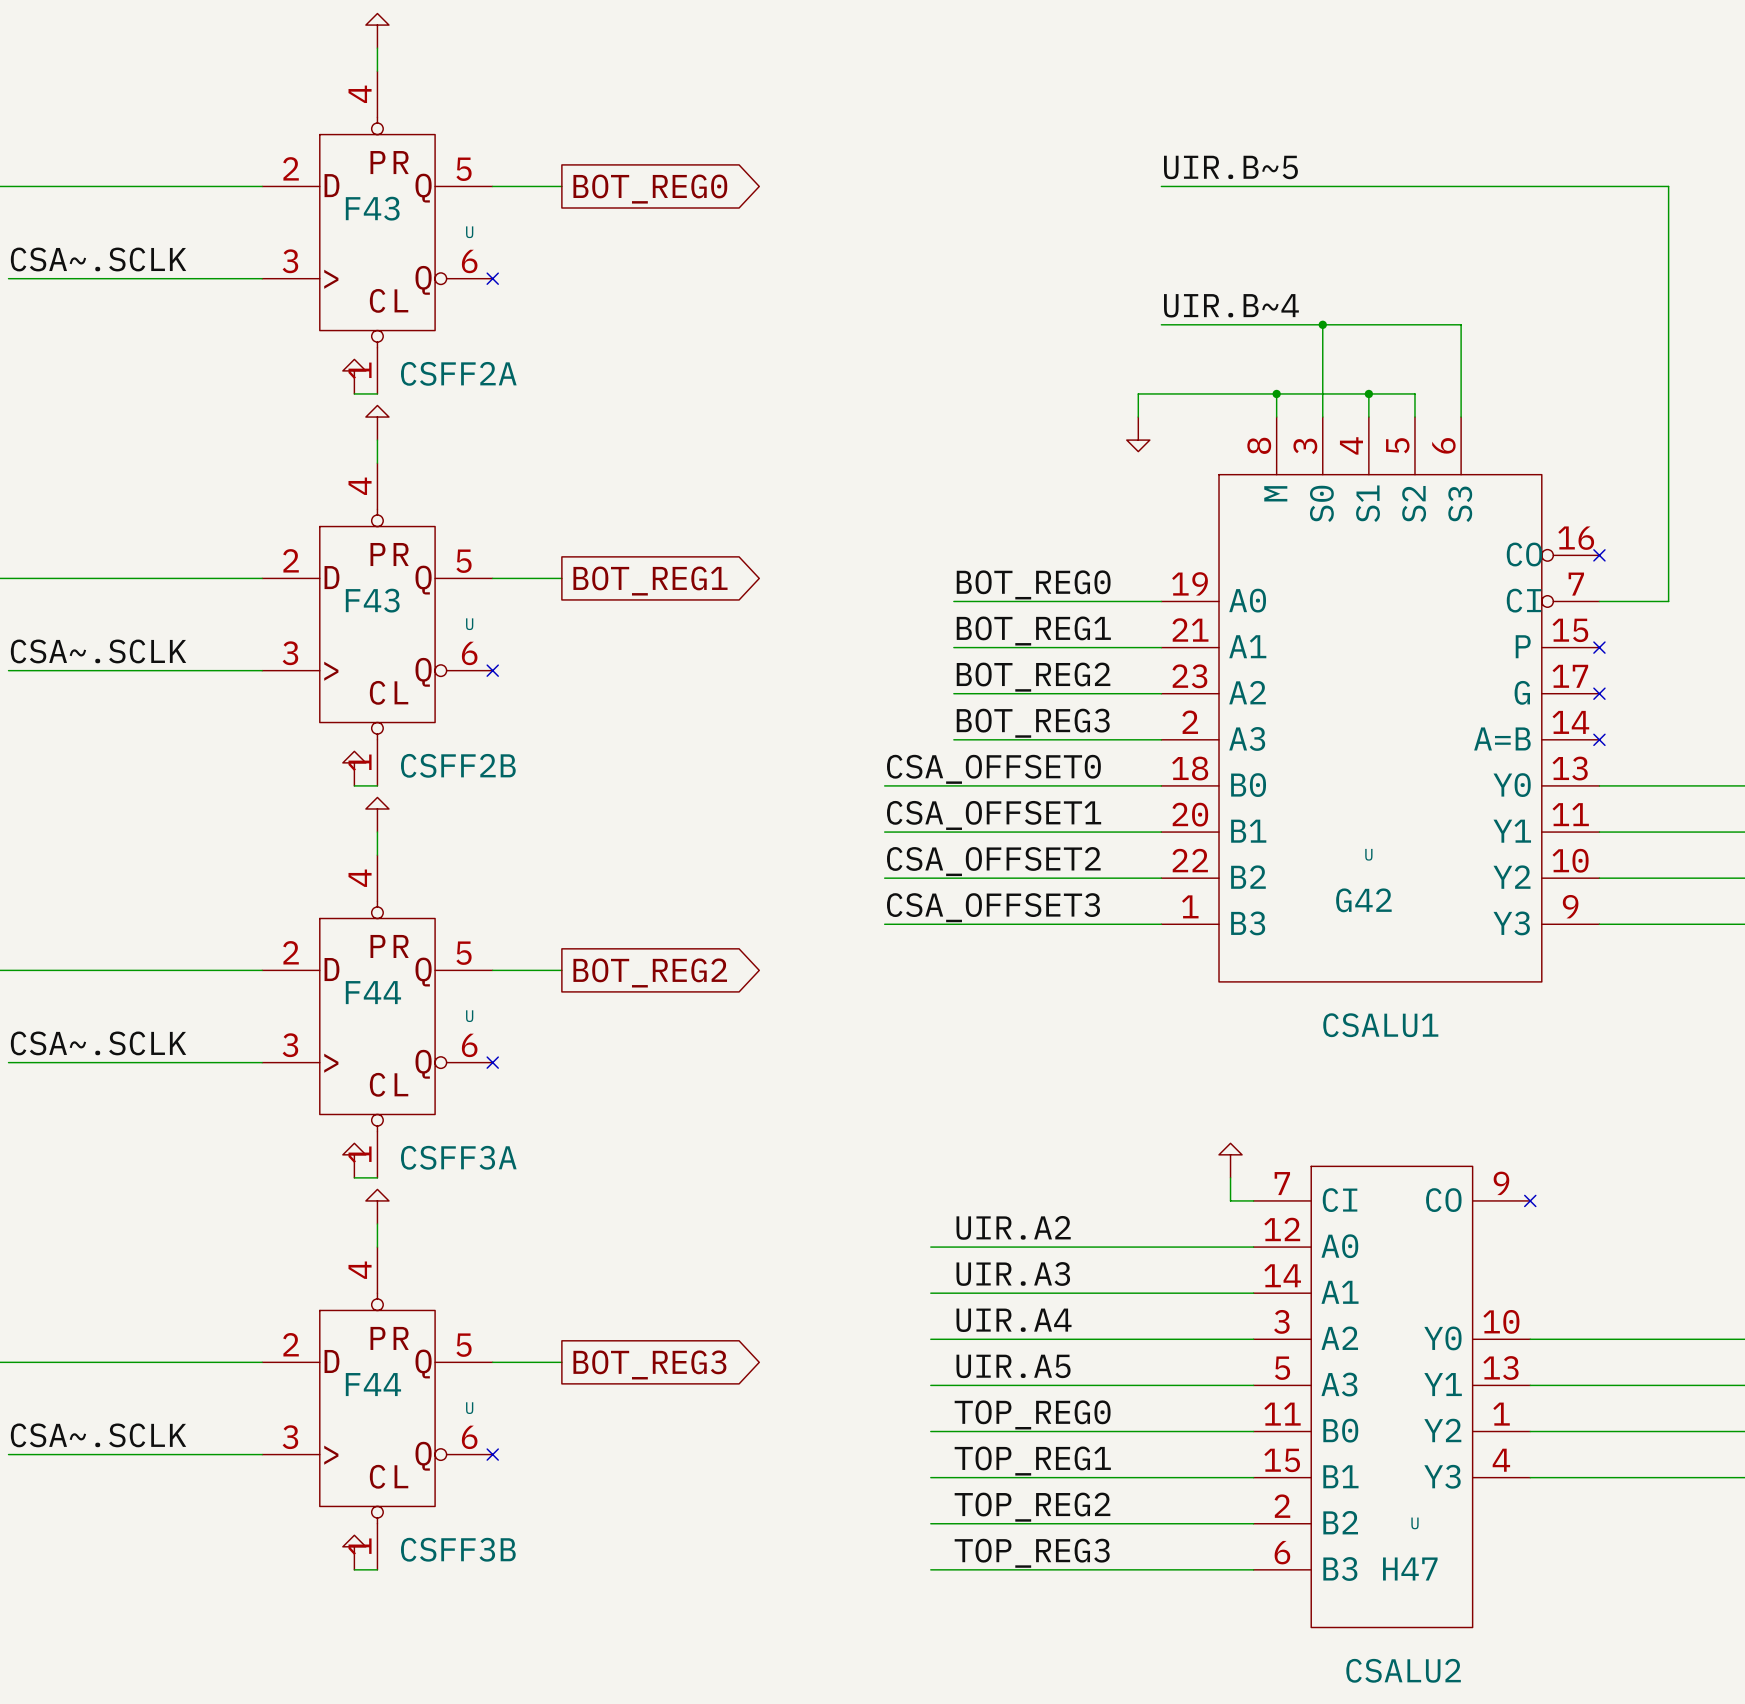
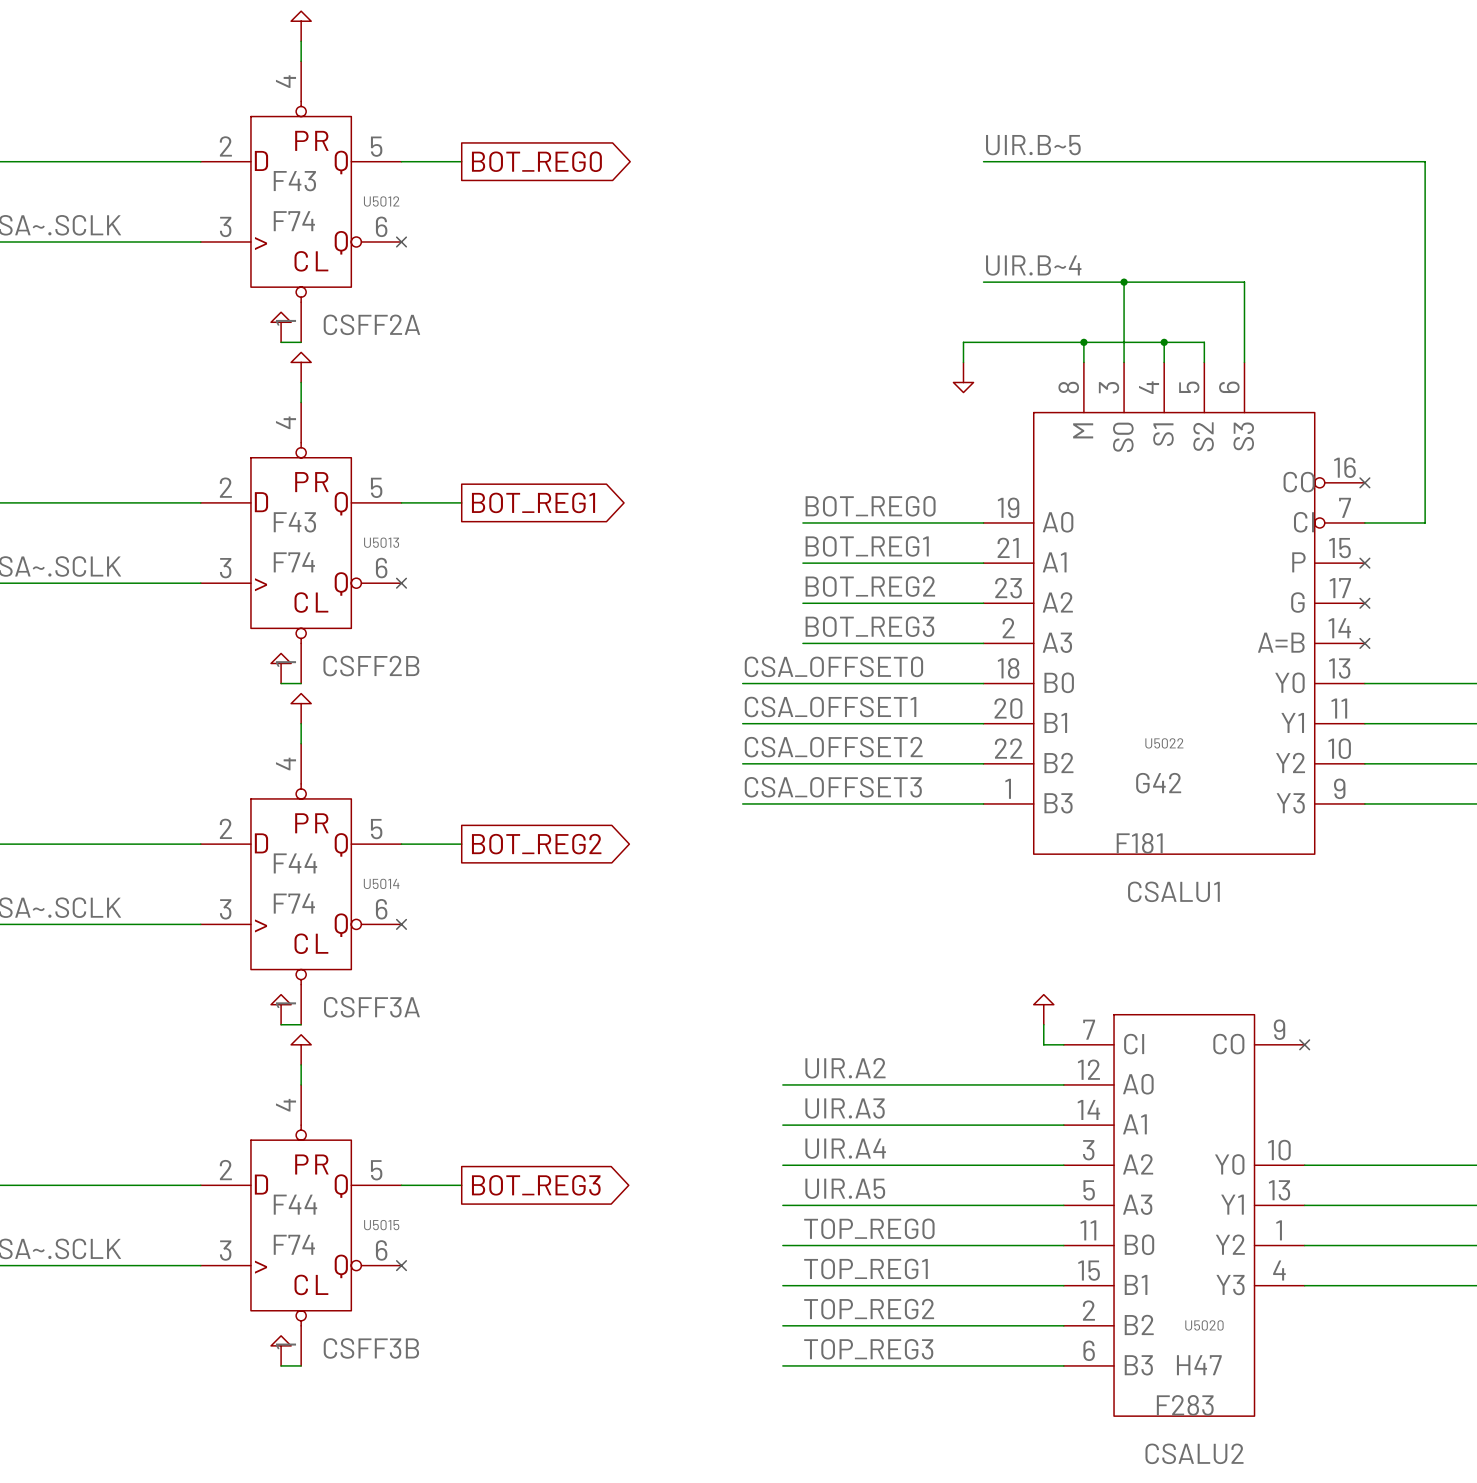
U name: U (469, 232) -> U5012 (381, 201)
U value: none -> F74 (294, 221)
U name: U (469, 624) -> U5013 (381, 542)
U value: none -> F74 (294, 562)
U name: U (1368, 854) -> U5022 (1164, 743)
U value: none -> F181 (1139, 843)
U name: U (469, 1016) -> U5014 (381, 883)
U value: none -> F74 (294, 903)
U name: U (469, 1408) -> U5015 (381, 1225)
U value: none -> F74 (294, 1244)
U name: U (1414, 1523) -> U5020 (1204, 1325)
U value: none -> F283 (1185, 1405)

